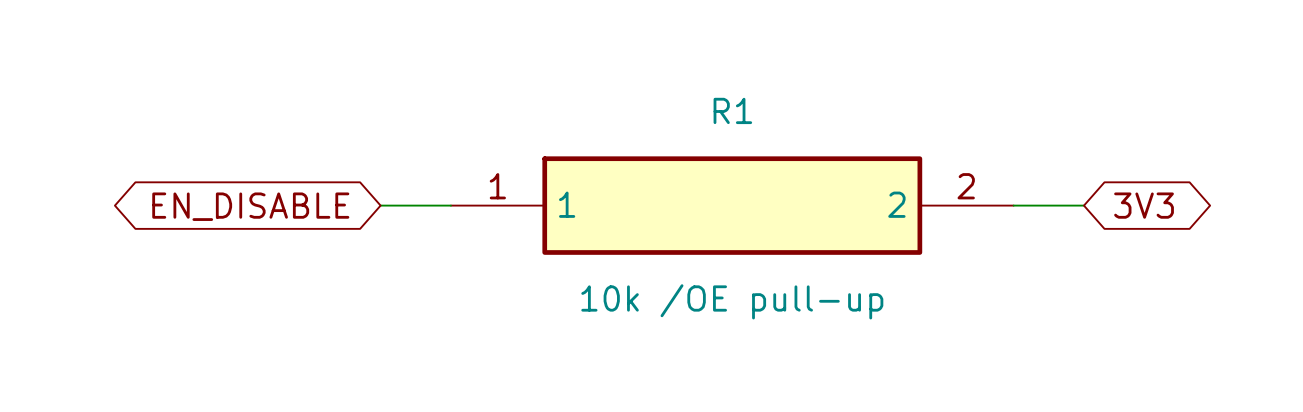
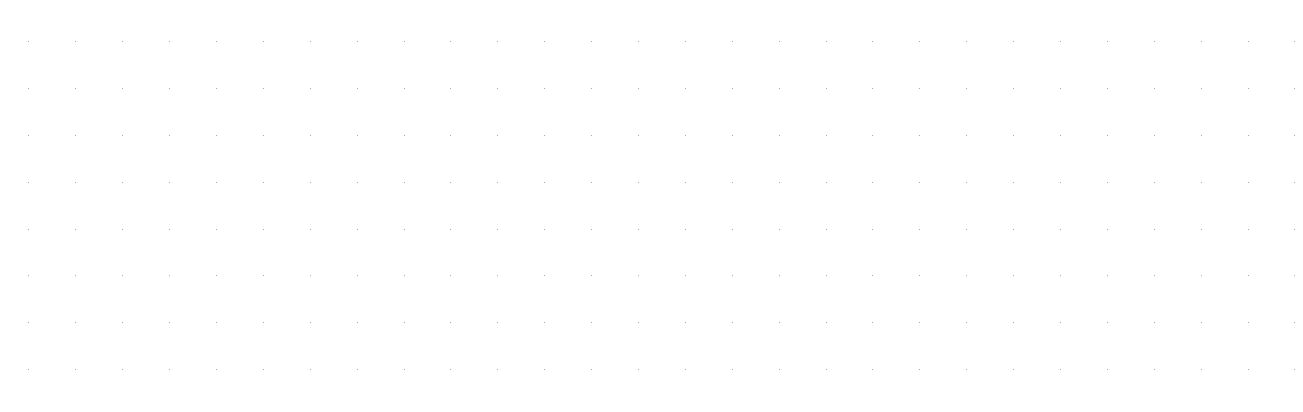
wire: (380, 205) (450, 205) -> none
R1: 10k /OE pull-up (732, 205) -> none
wire: (1013, 205) (1083, 205) -> none
global label: 3V3 (1144, 205) -> none
global label: EN_DISABLE (250, 206) -> none

